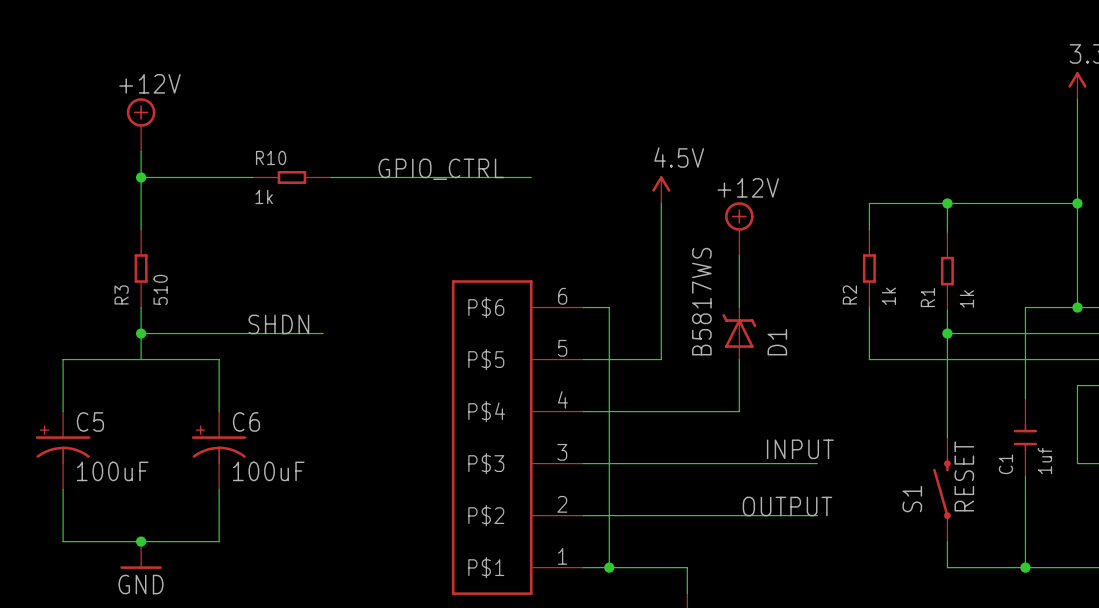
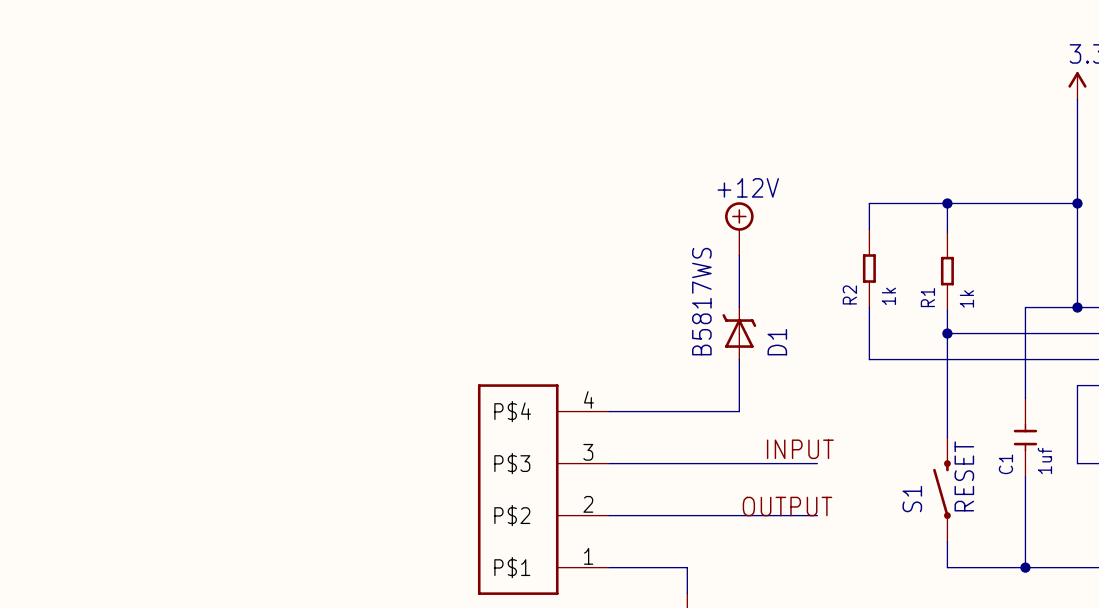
power symbol: +12V (141, 124) -> none
wire: (141, 151) (141, 229) -> none
label: GPIO_CTRL (441, 169) -> none
wire: (141, 177) (252, 177) -> none
junction: (141, 177) -> none
R10: 1k (291, 177) -> none
wire: (330, 177) (531, 177) -> none
power symbol: 4.5V (661, 189) -> none
wire: (661, 203) (661, 359) (583, 359) -> none
R3: 510 (141, 268) -> none
wire: (141, 307) (141, 359) -> none
wire: (583, 307) (609, 307) (609, 567) (583, 567) -> none
label: SHDN (278, 324) -> none
wire: (141, 333) (323, 333) -> none
junction: (141, 333) -> none
wire: (63, 411) (63, 359) (219, 359) (219, 411) -> none
part: (517, 437) -> none
C5: 100uF (63, 450) -> none
C6: 100uF (219, 450) -> none
wire: (63, 489) (63, 541) (219, 541) (219, 489) -> none
part: none -> (543, 489)
junction: (141, 541) -> none
power symbol: GND (141, 555) -> none
junction: (609, 567) -> none

